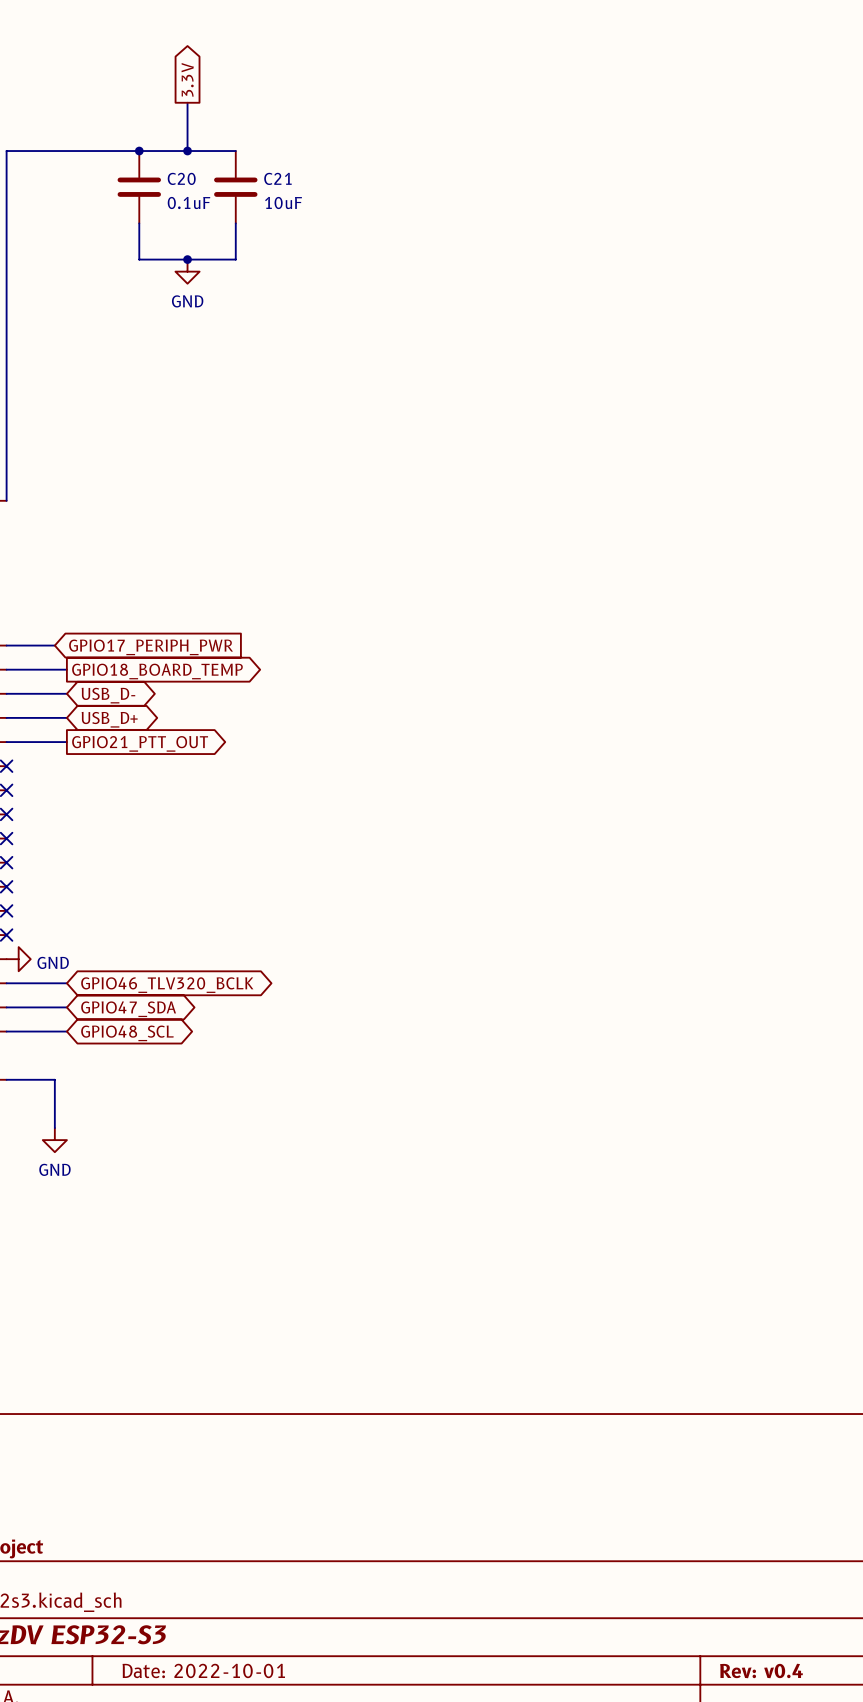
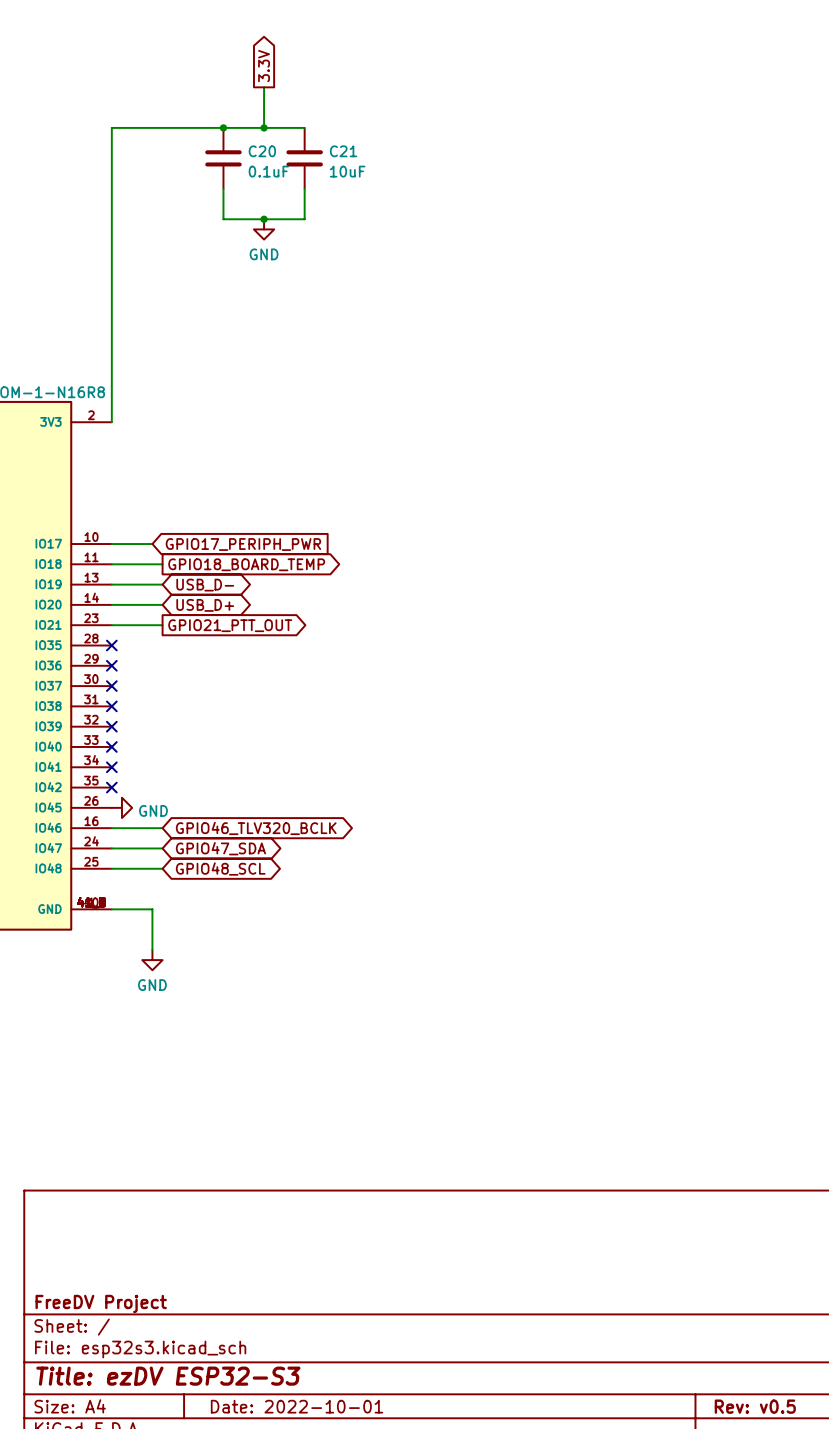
title block: Rev: v0.4 (761, 1670) -> Rev: v0.5 (755, 1406)

